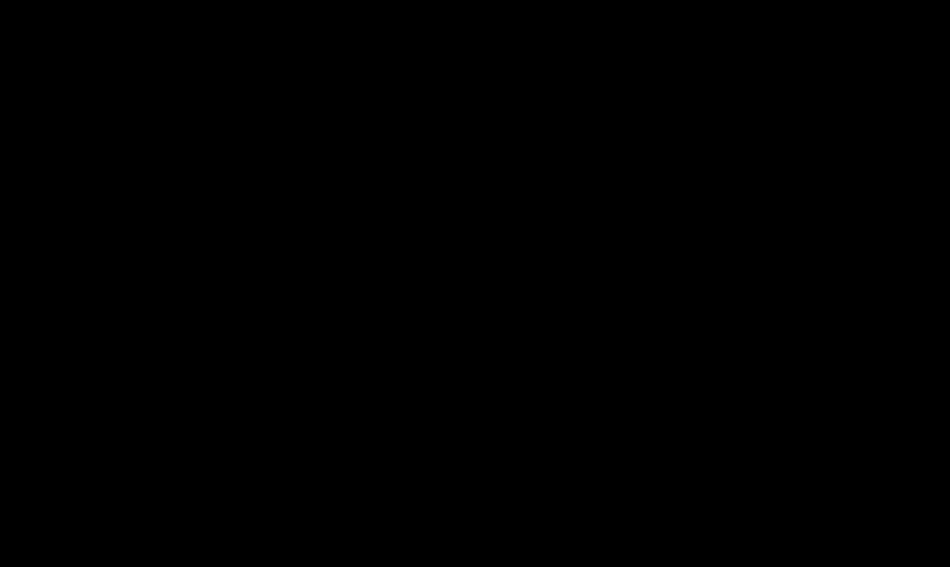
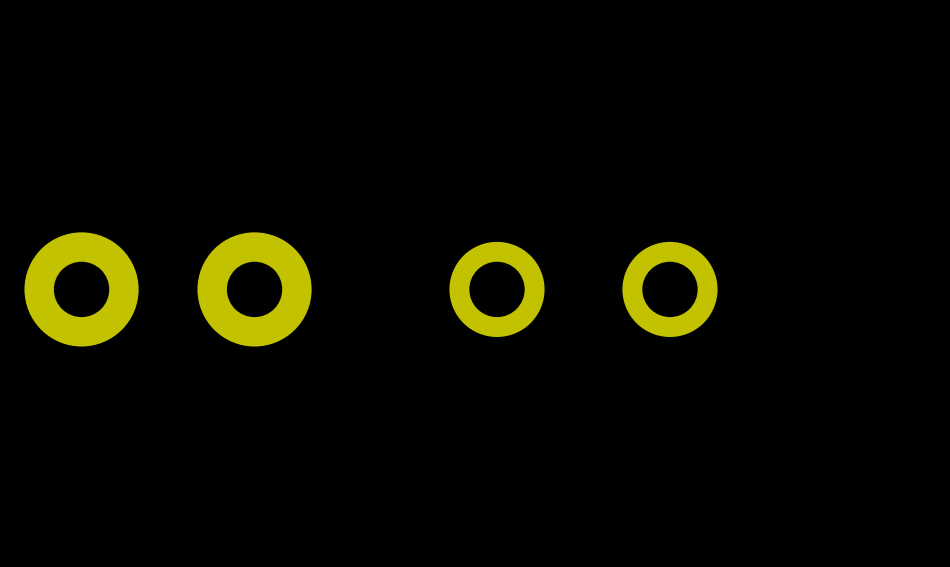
part: none -> (168, 289)
part: none -> (583, 289)

